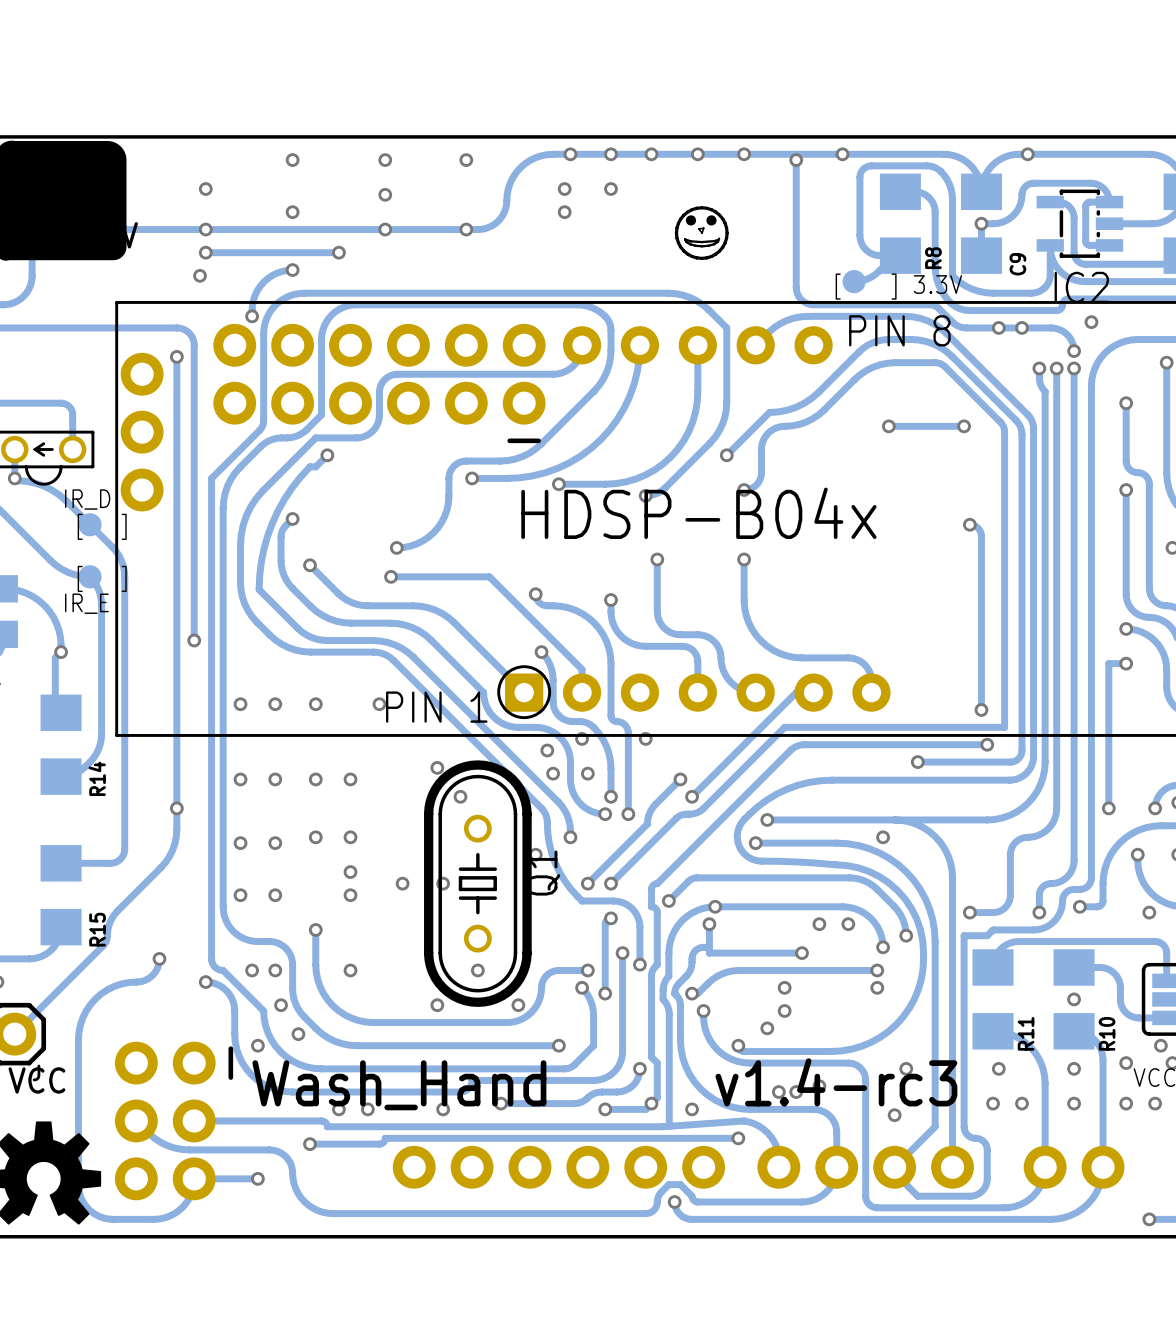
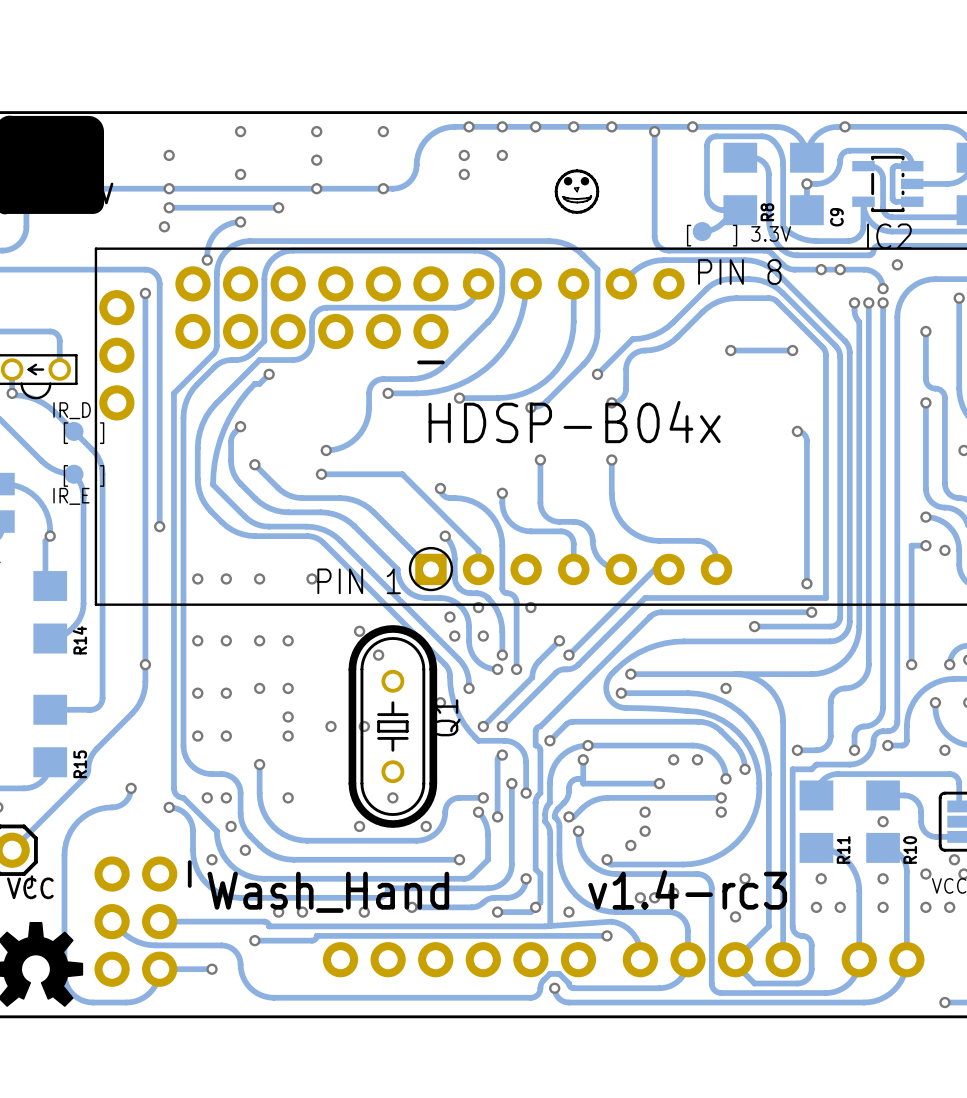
via: none -> (944, 550)

